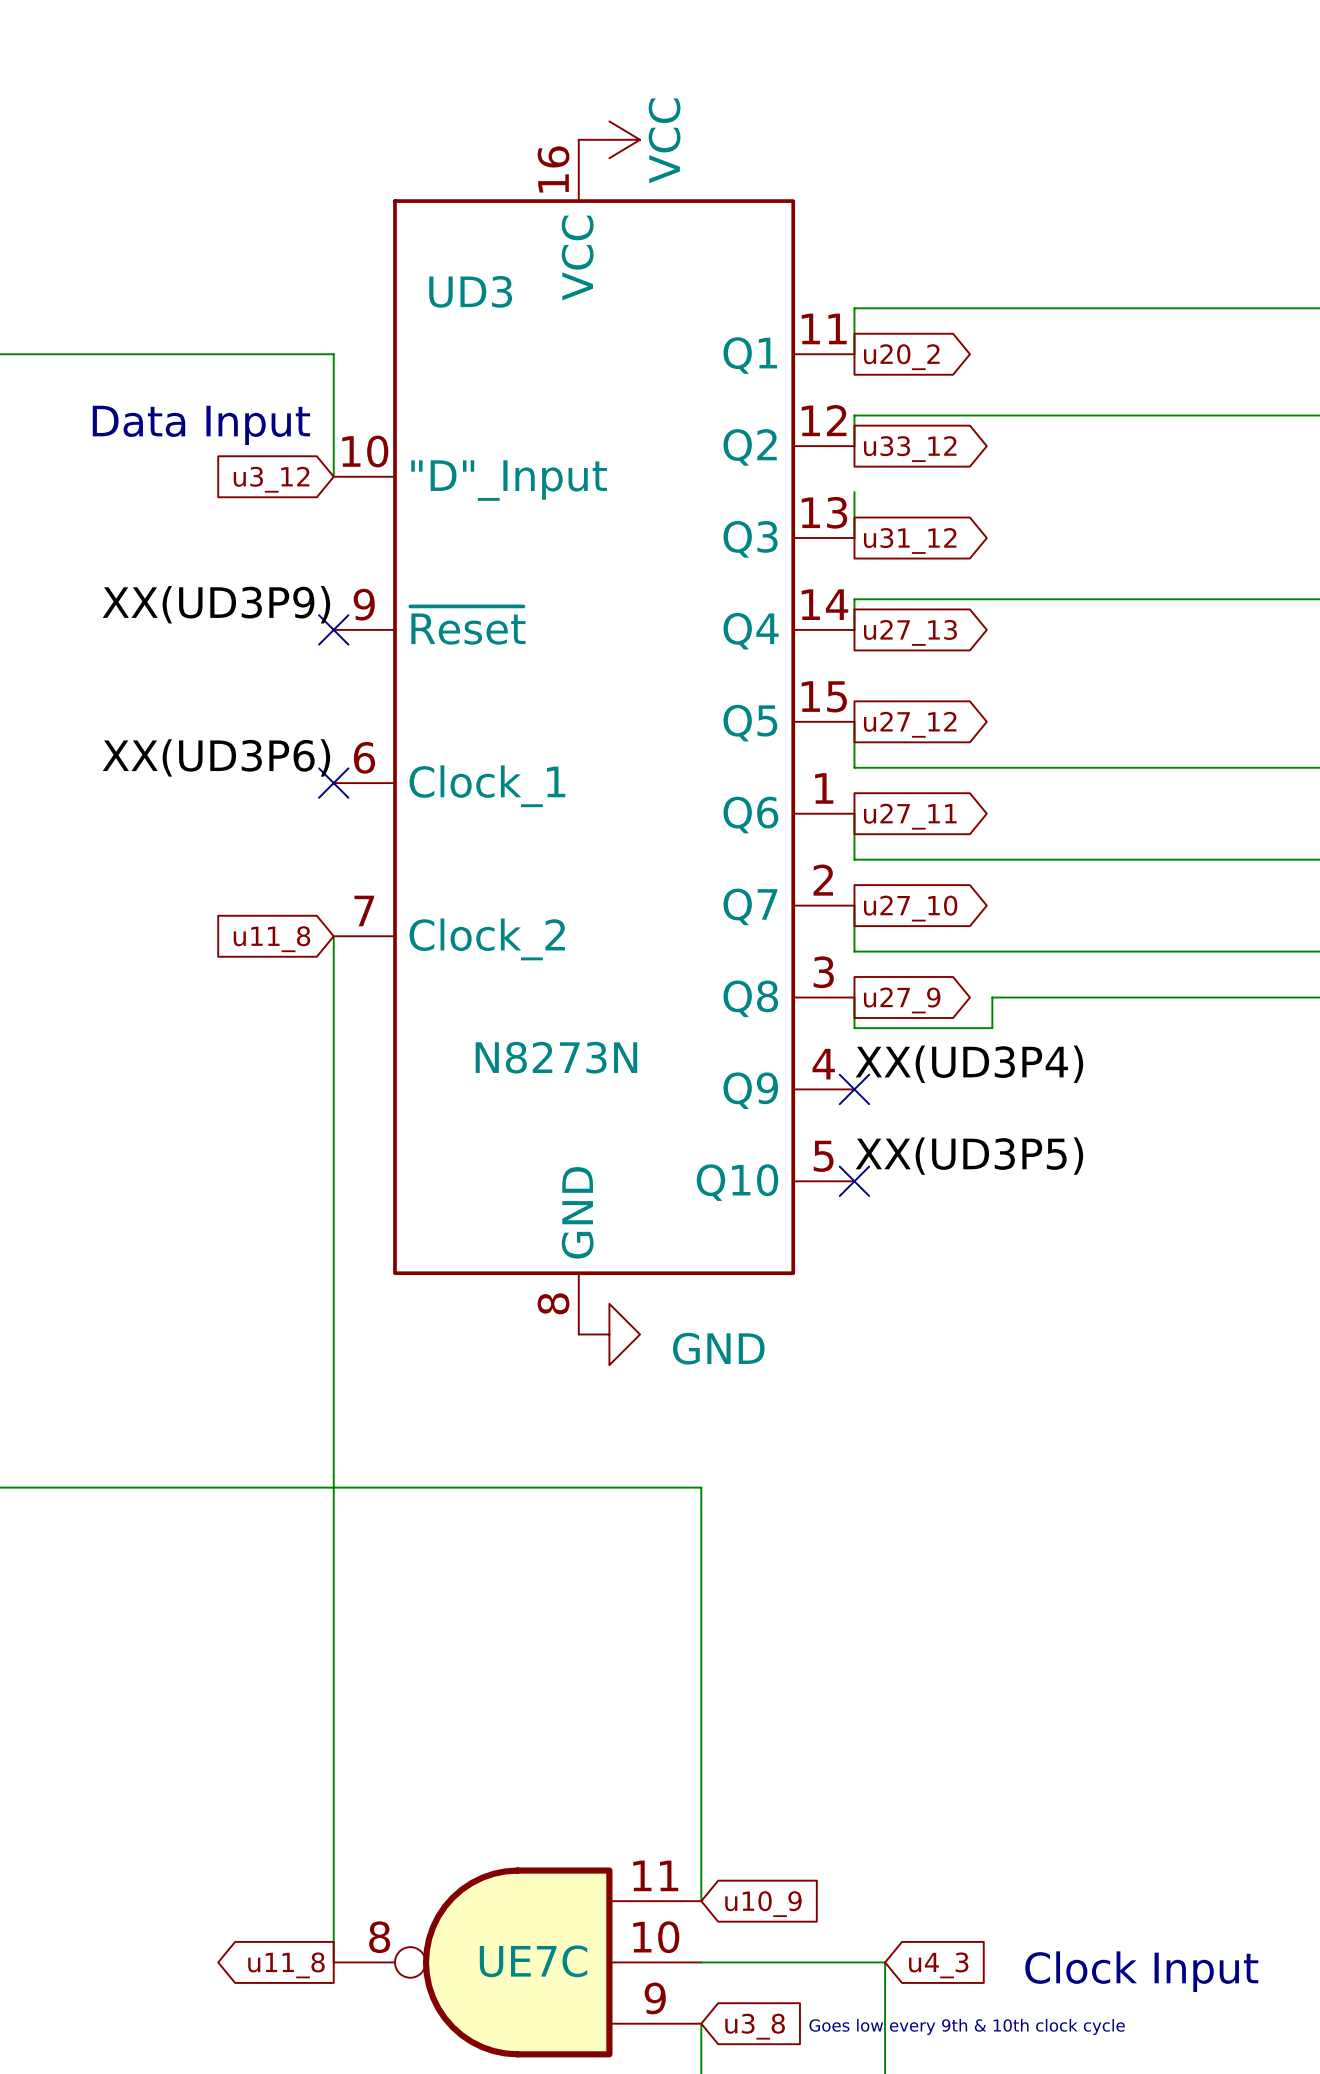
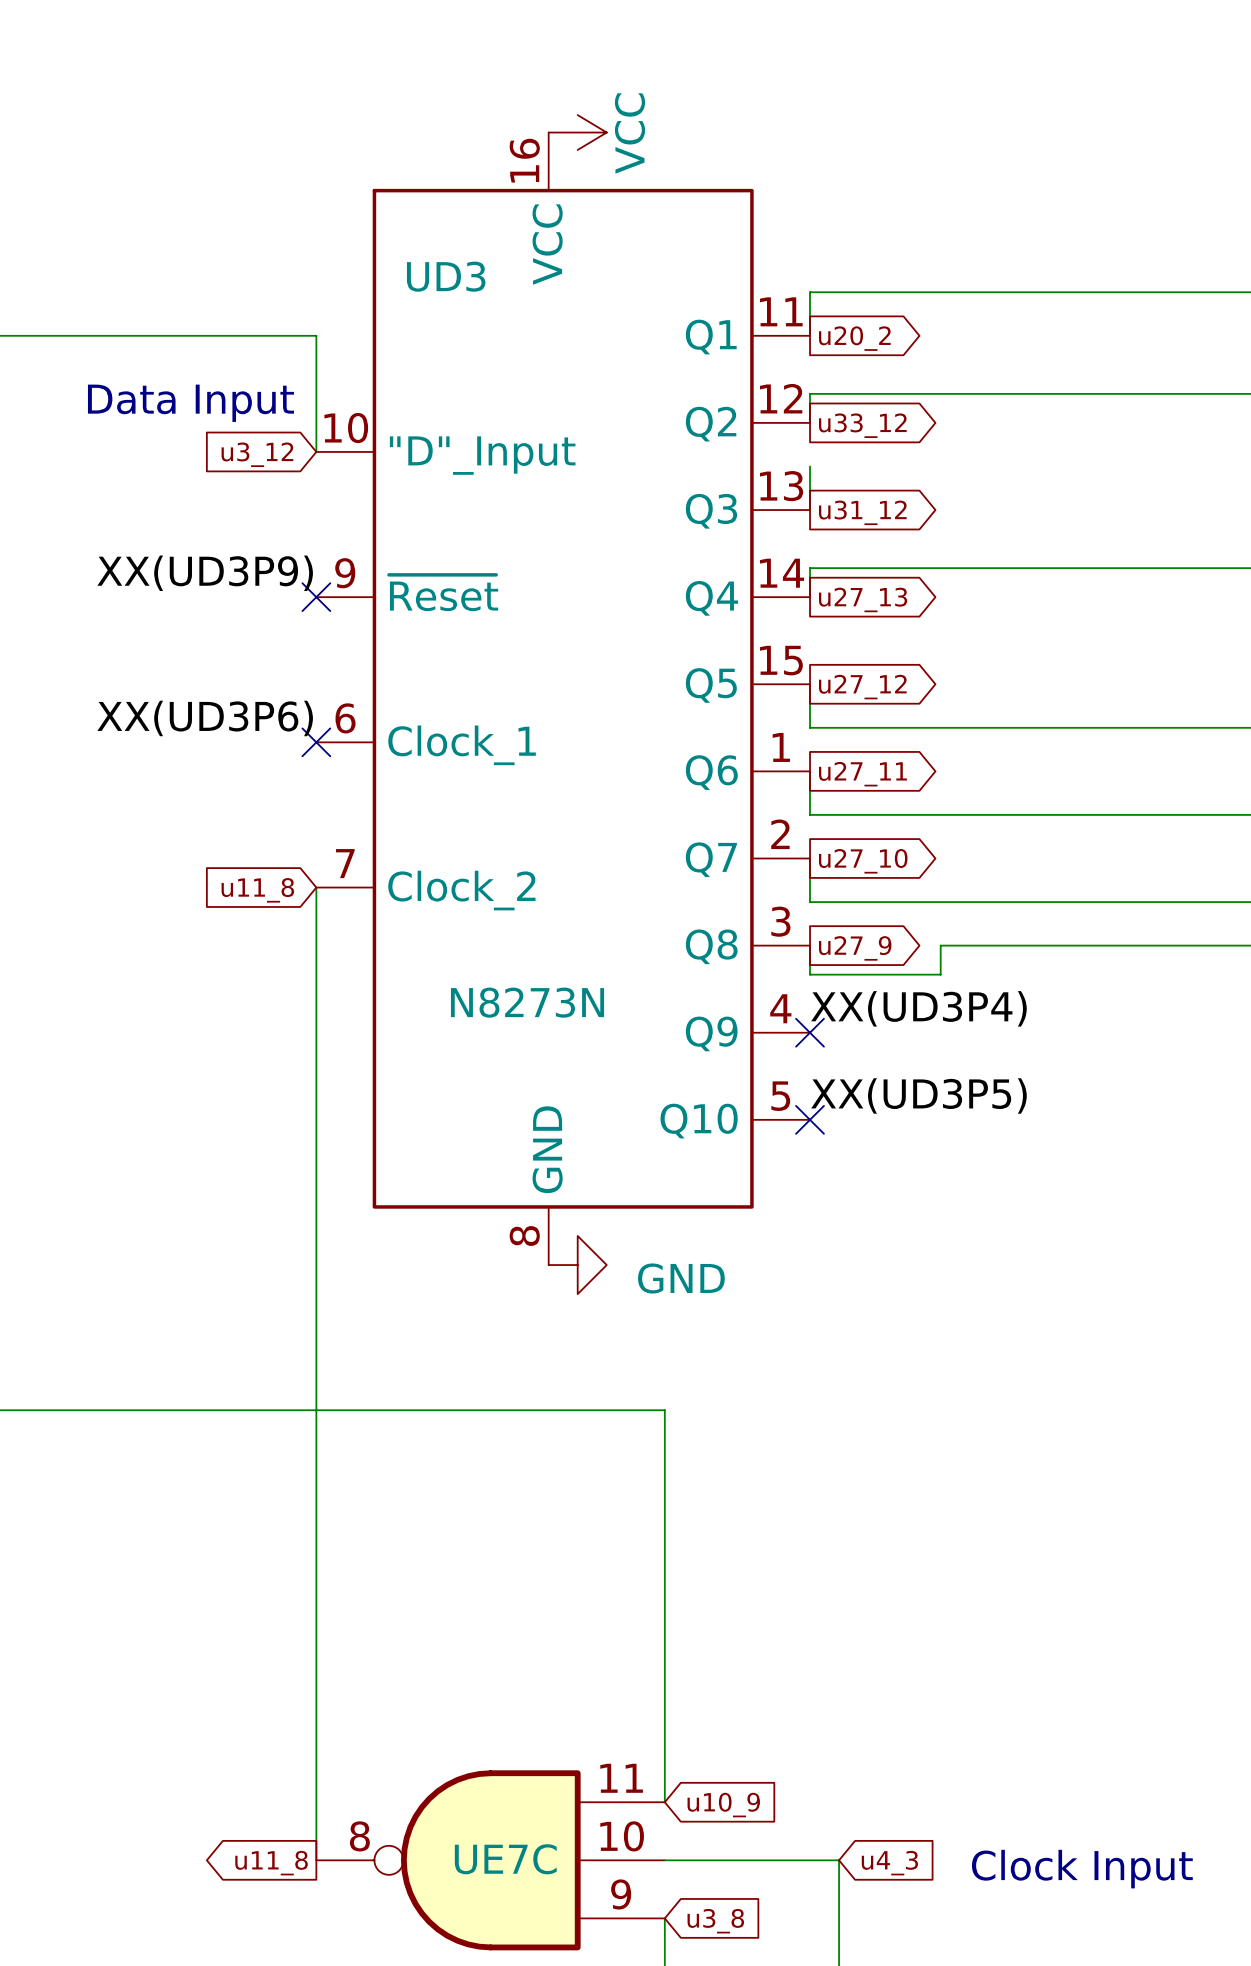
text: Goes low every 9th & 10th clock cycle (967, 2026) -> none

